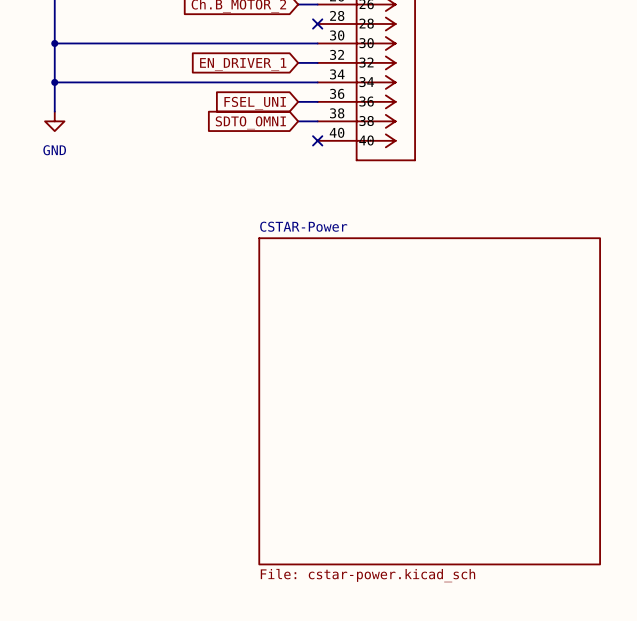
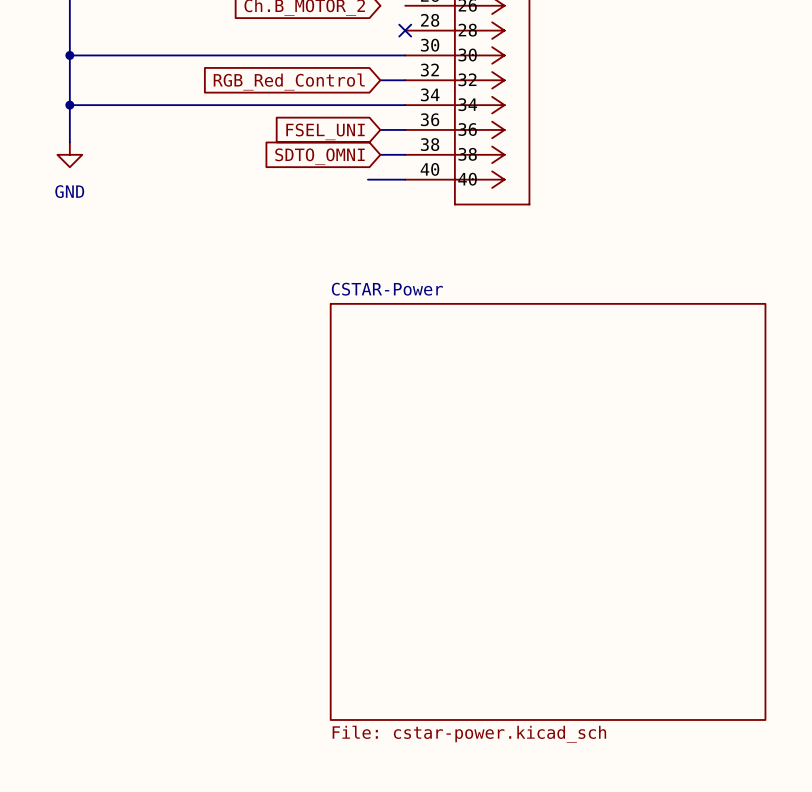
wire: (298, 4) (317, 4) -> none
global label: EN_DRIVER_1 (243, 64) -> RGB_Red_Control (289, 81)
wire: none -> (367, 179) (405, 179)
no-connect mark: (317, 140) -> none

